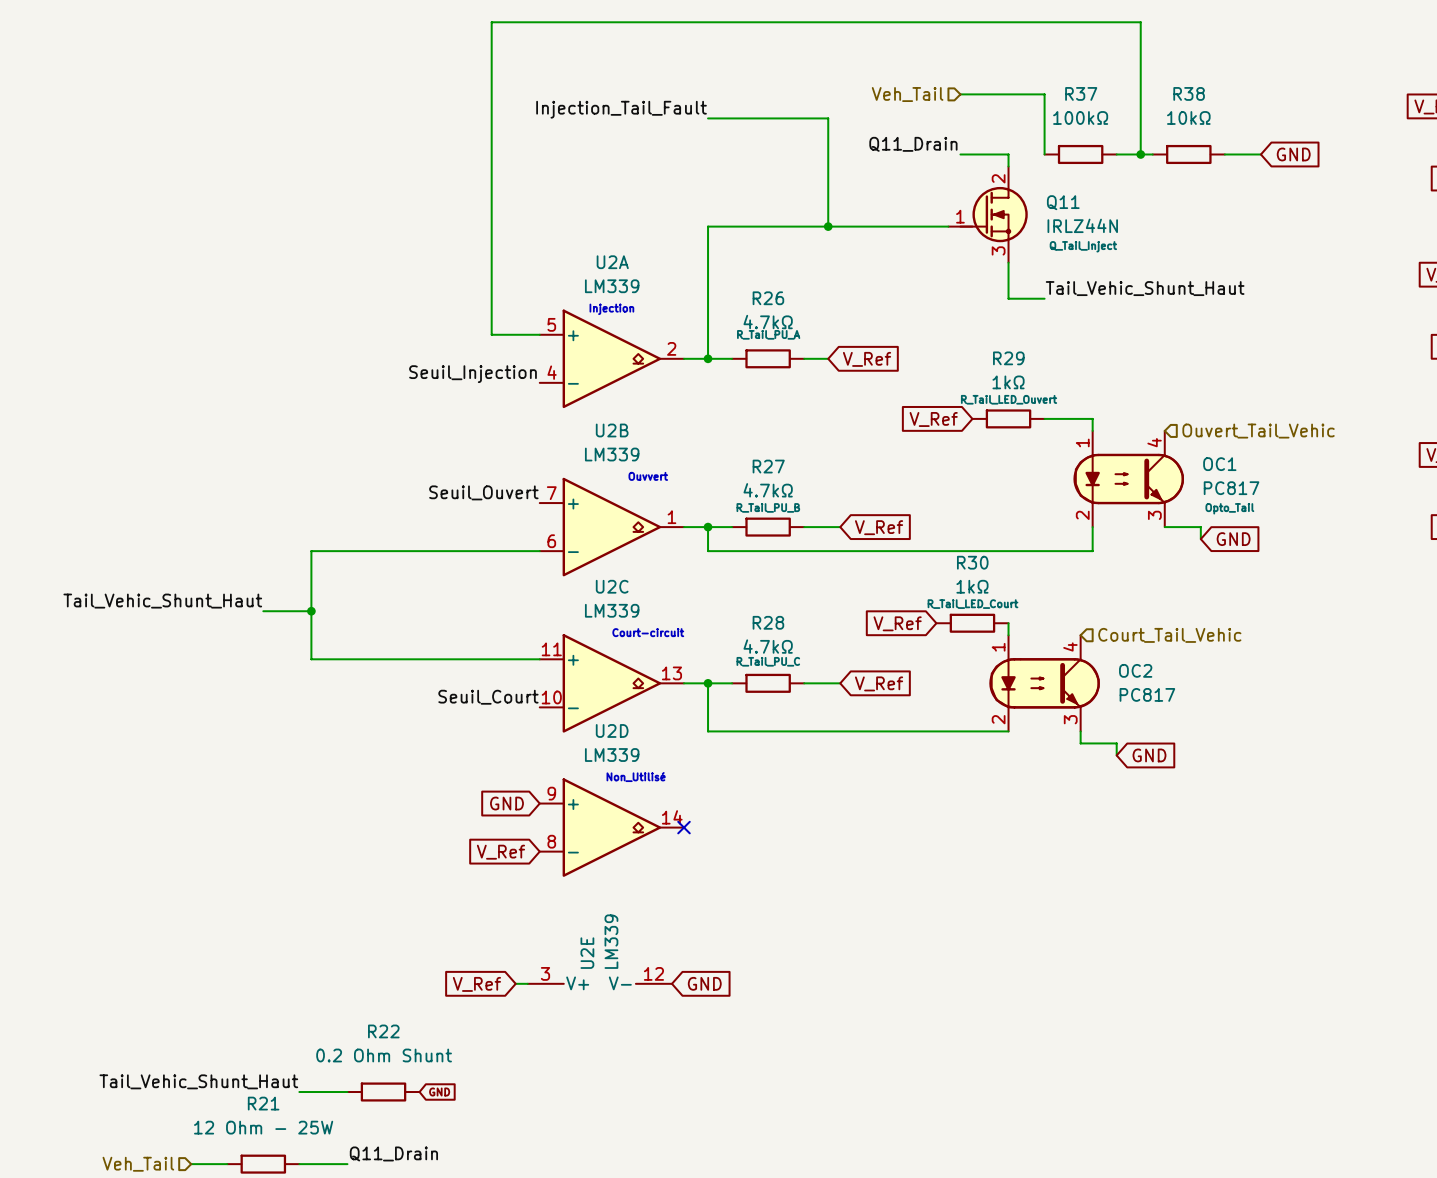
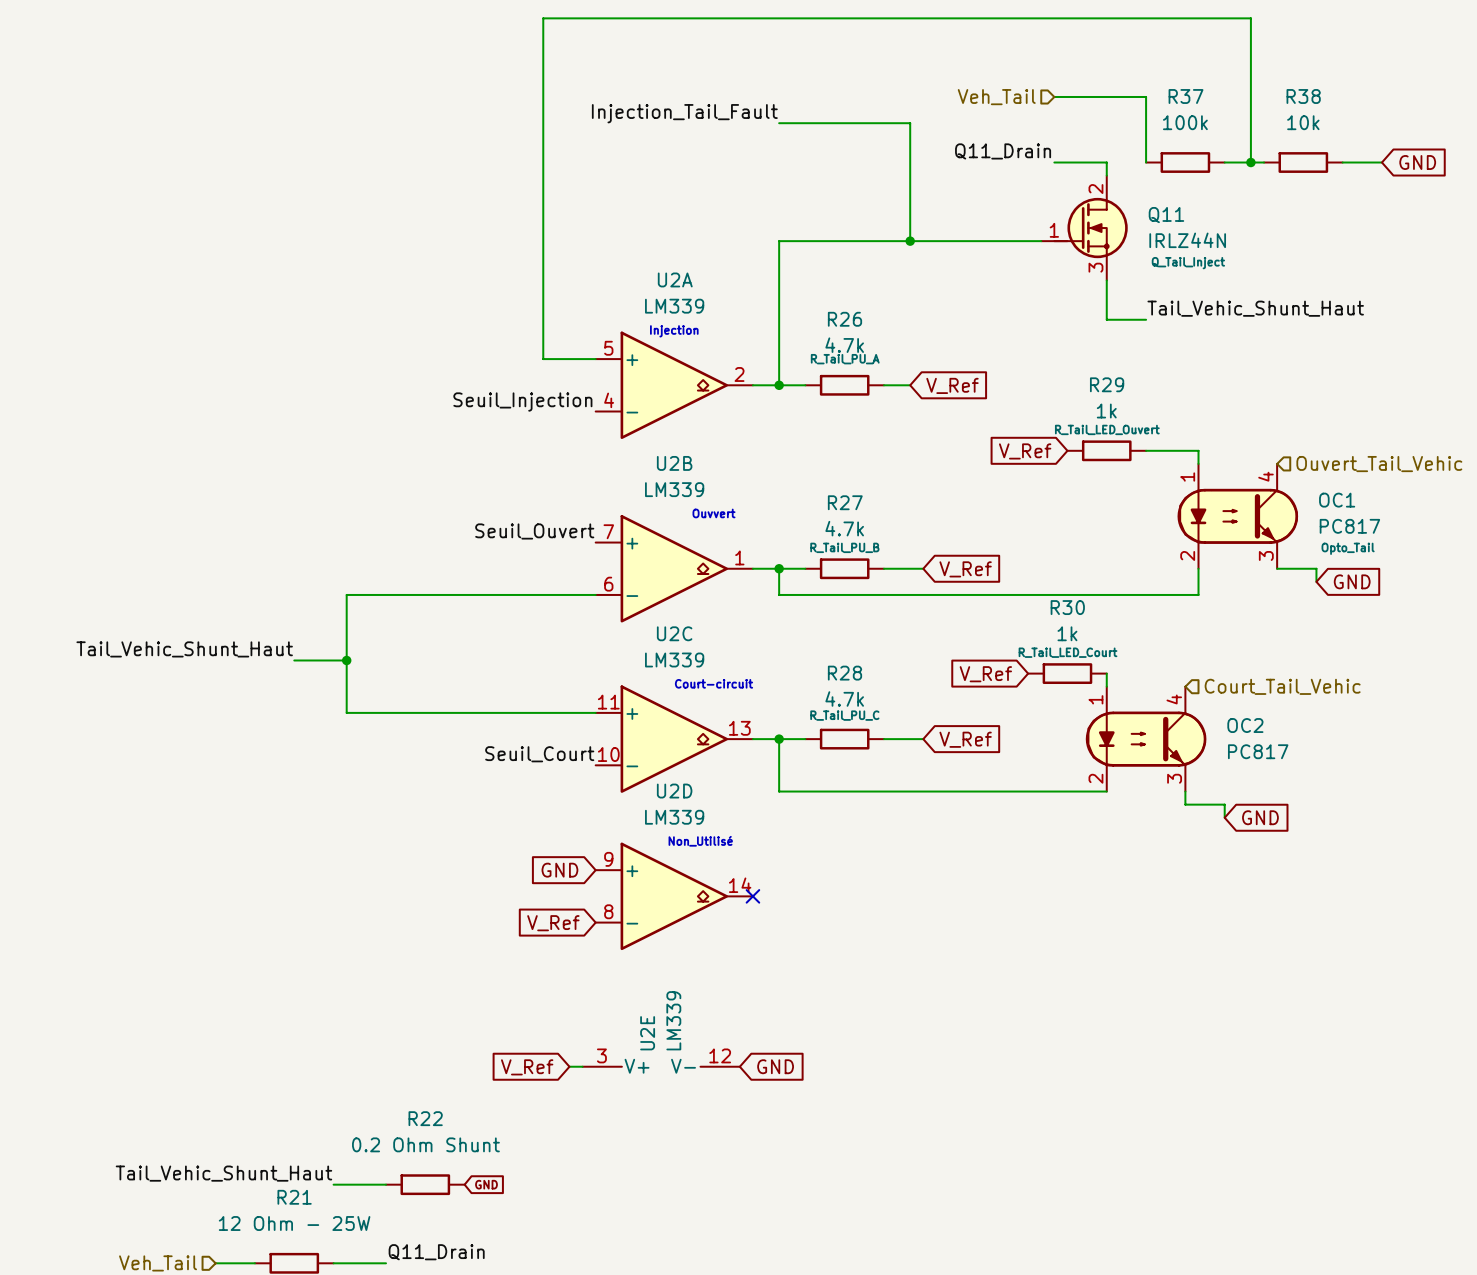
R37 value: 100kΩ (1080, 117) -> 100k (1185, 122)
R38 value: 10kΩ (1188, 117) -> 10k (1303, 122)
R26 value: 4.7kΩ (768, 322) -> 4.7k (844, 345)
R29 value: 1kΩ (1008, 382) -> 1k (1106, 411)
R27 value: 4.7kΩ (768, 490) -> 4.7k (844, 528)
R30 value: 1kΩ (972, 586) -> 1k (1067, 633)
R28 value: 4.7kΩ (768, 646) -> 4.7k (844, 699)

